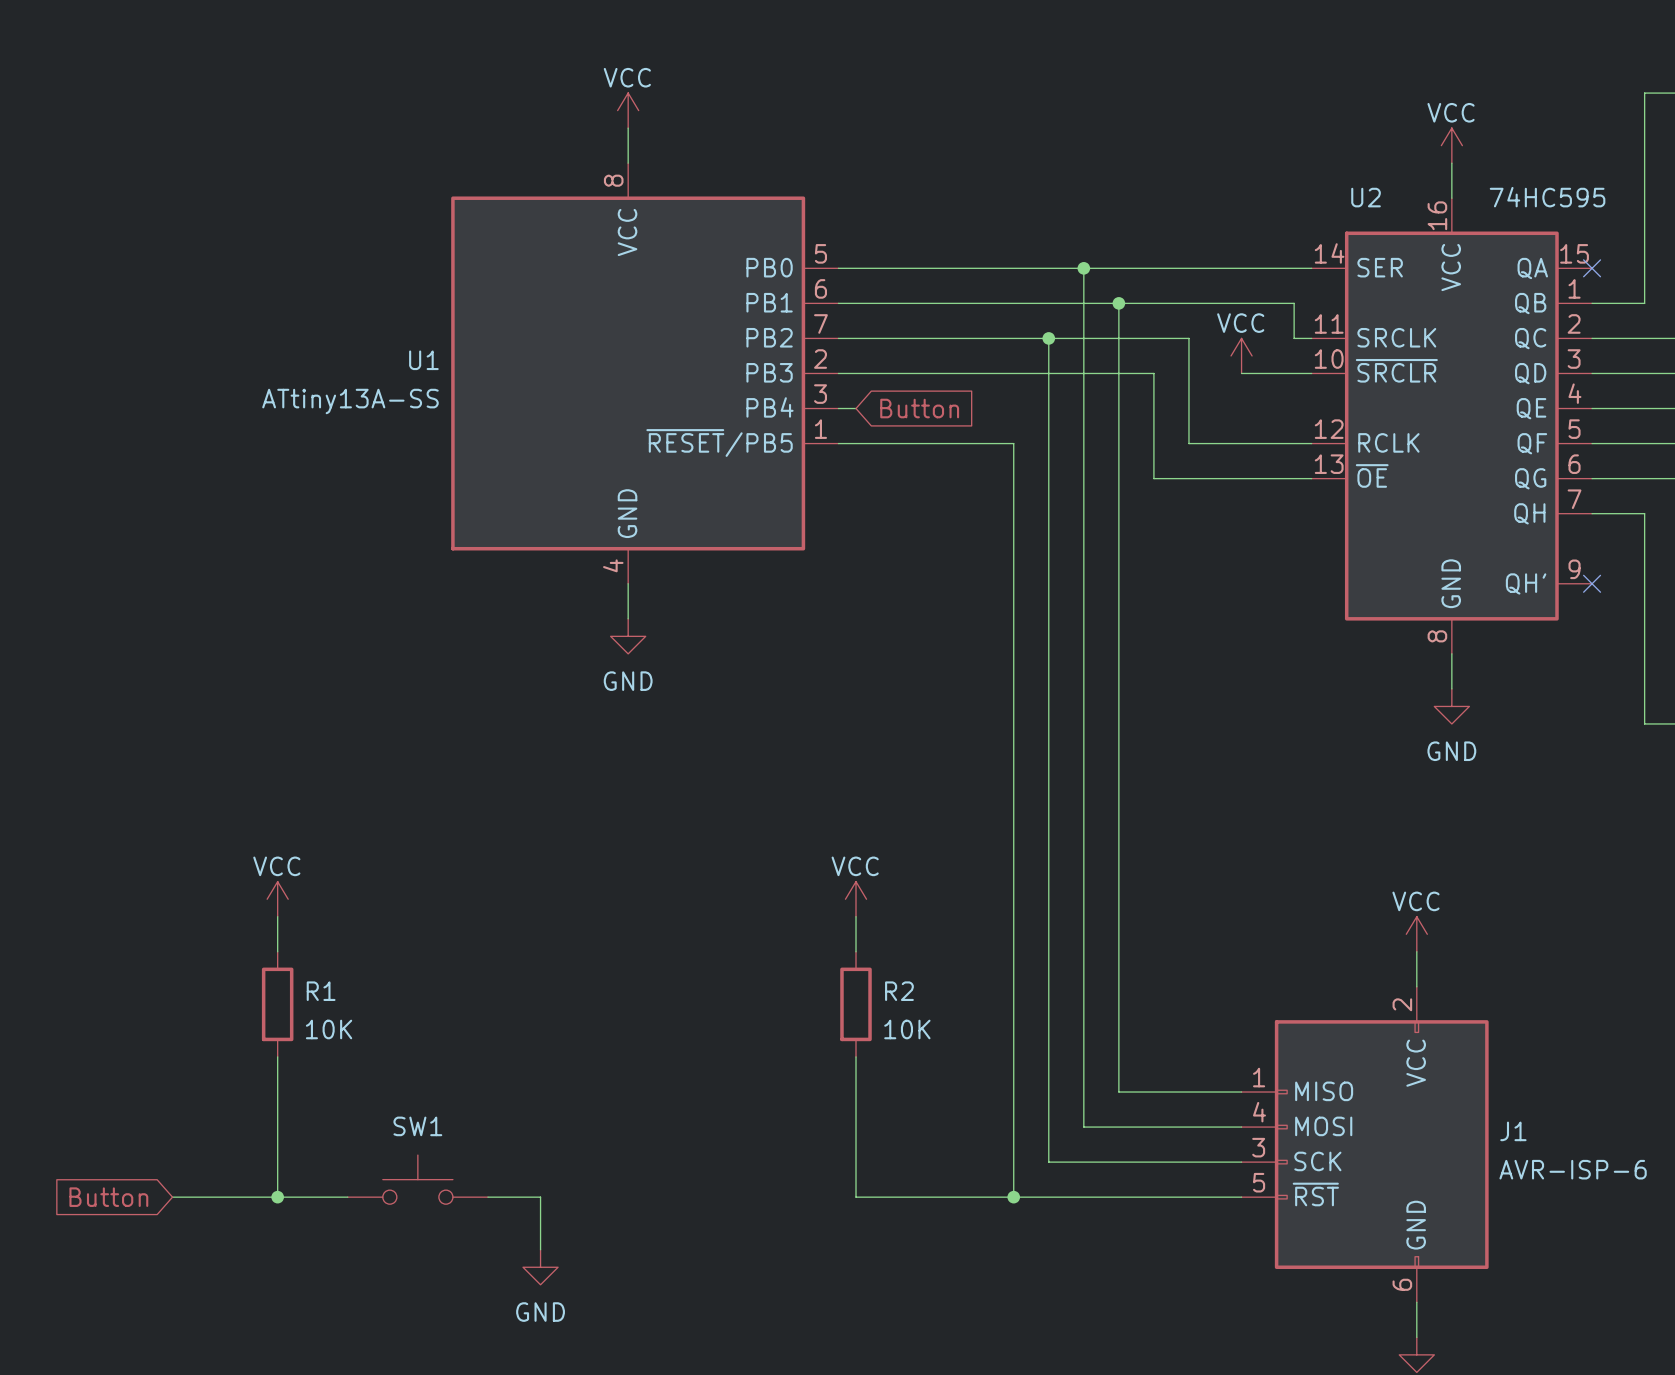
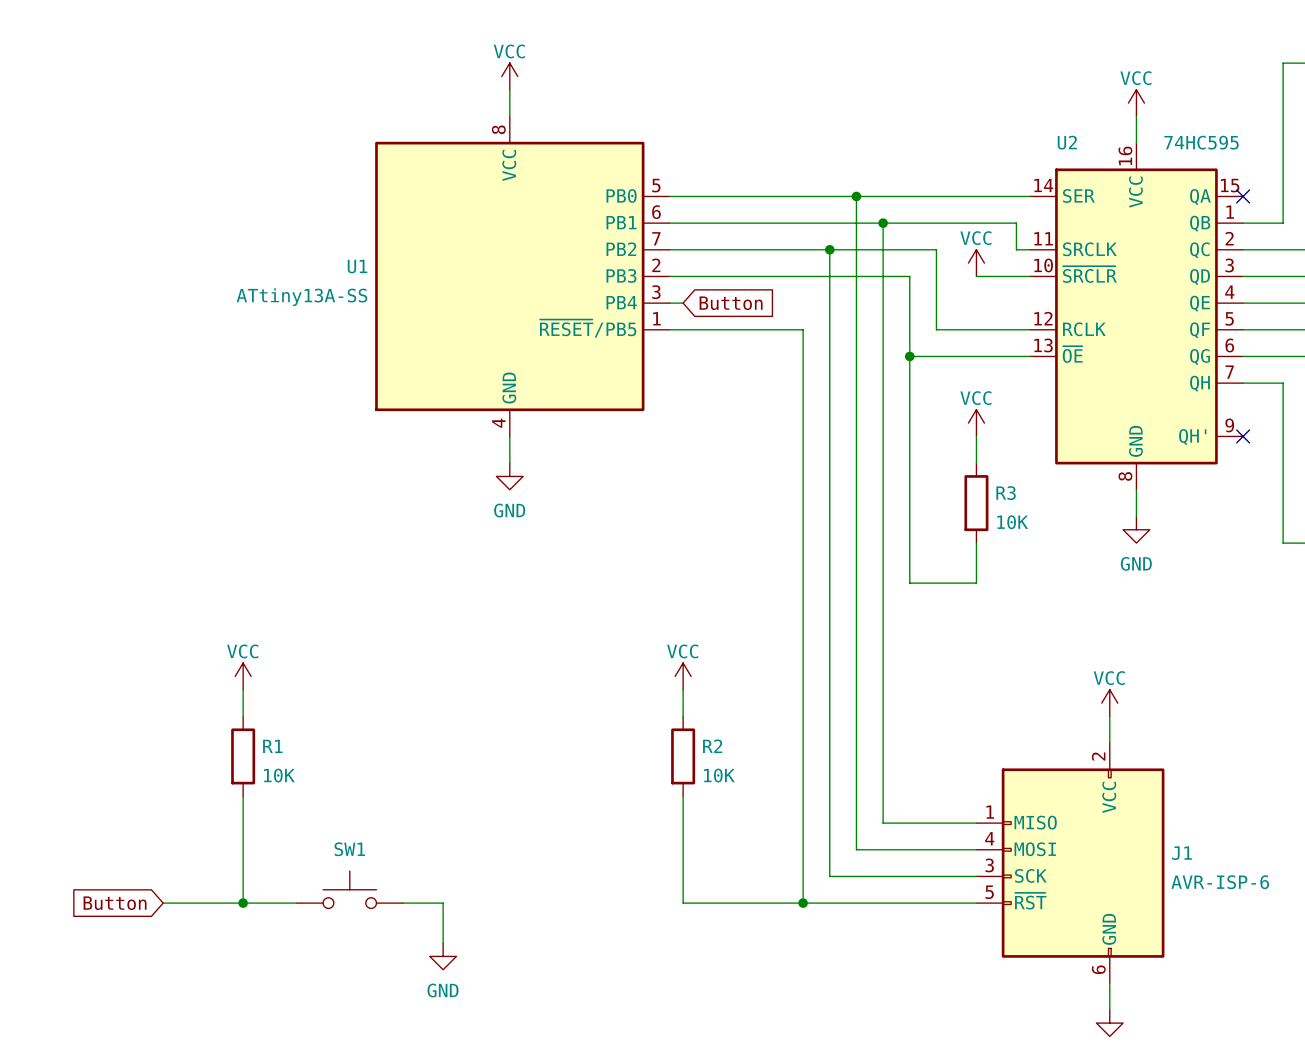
wire: none -> (909, 356) (909, 583) (976, 583) (976, 543)
junction: none -> (909, 356)
power symbol: none -> VCC (976, 423)
wire: none -> (976, 436) (976, 463)
R3: none -> 10K (976, 503)

